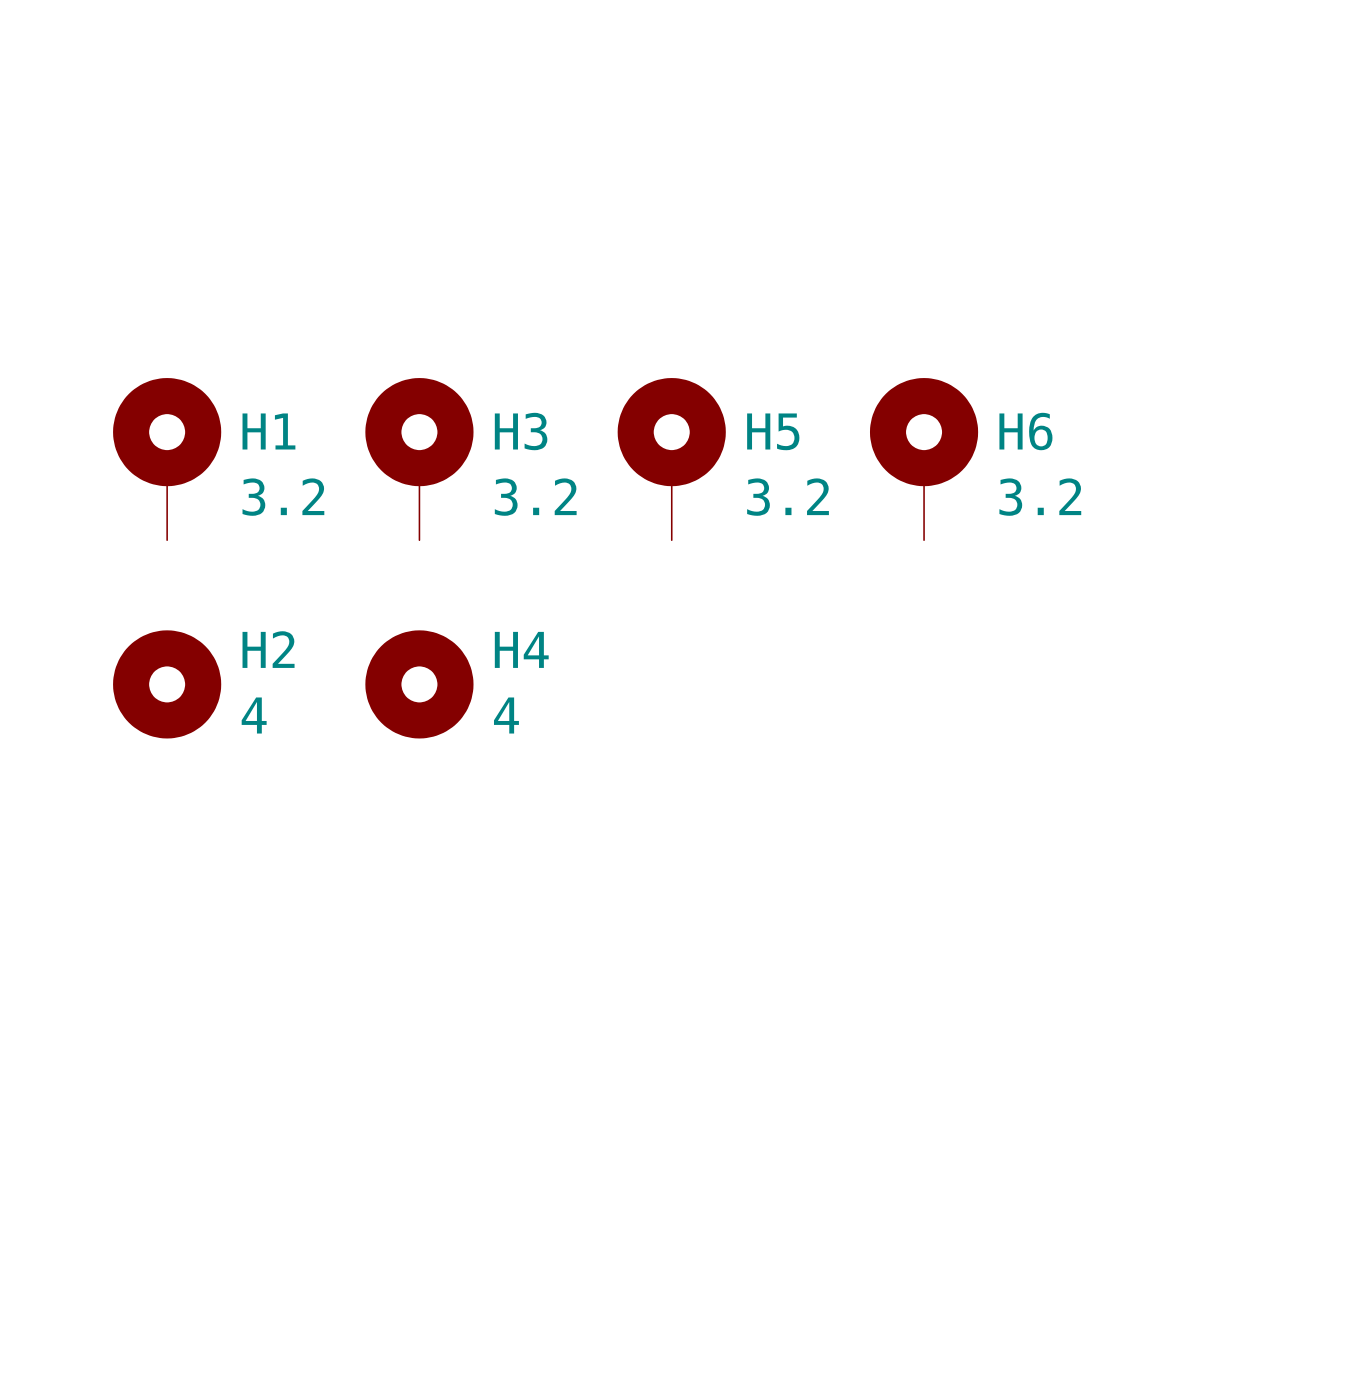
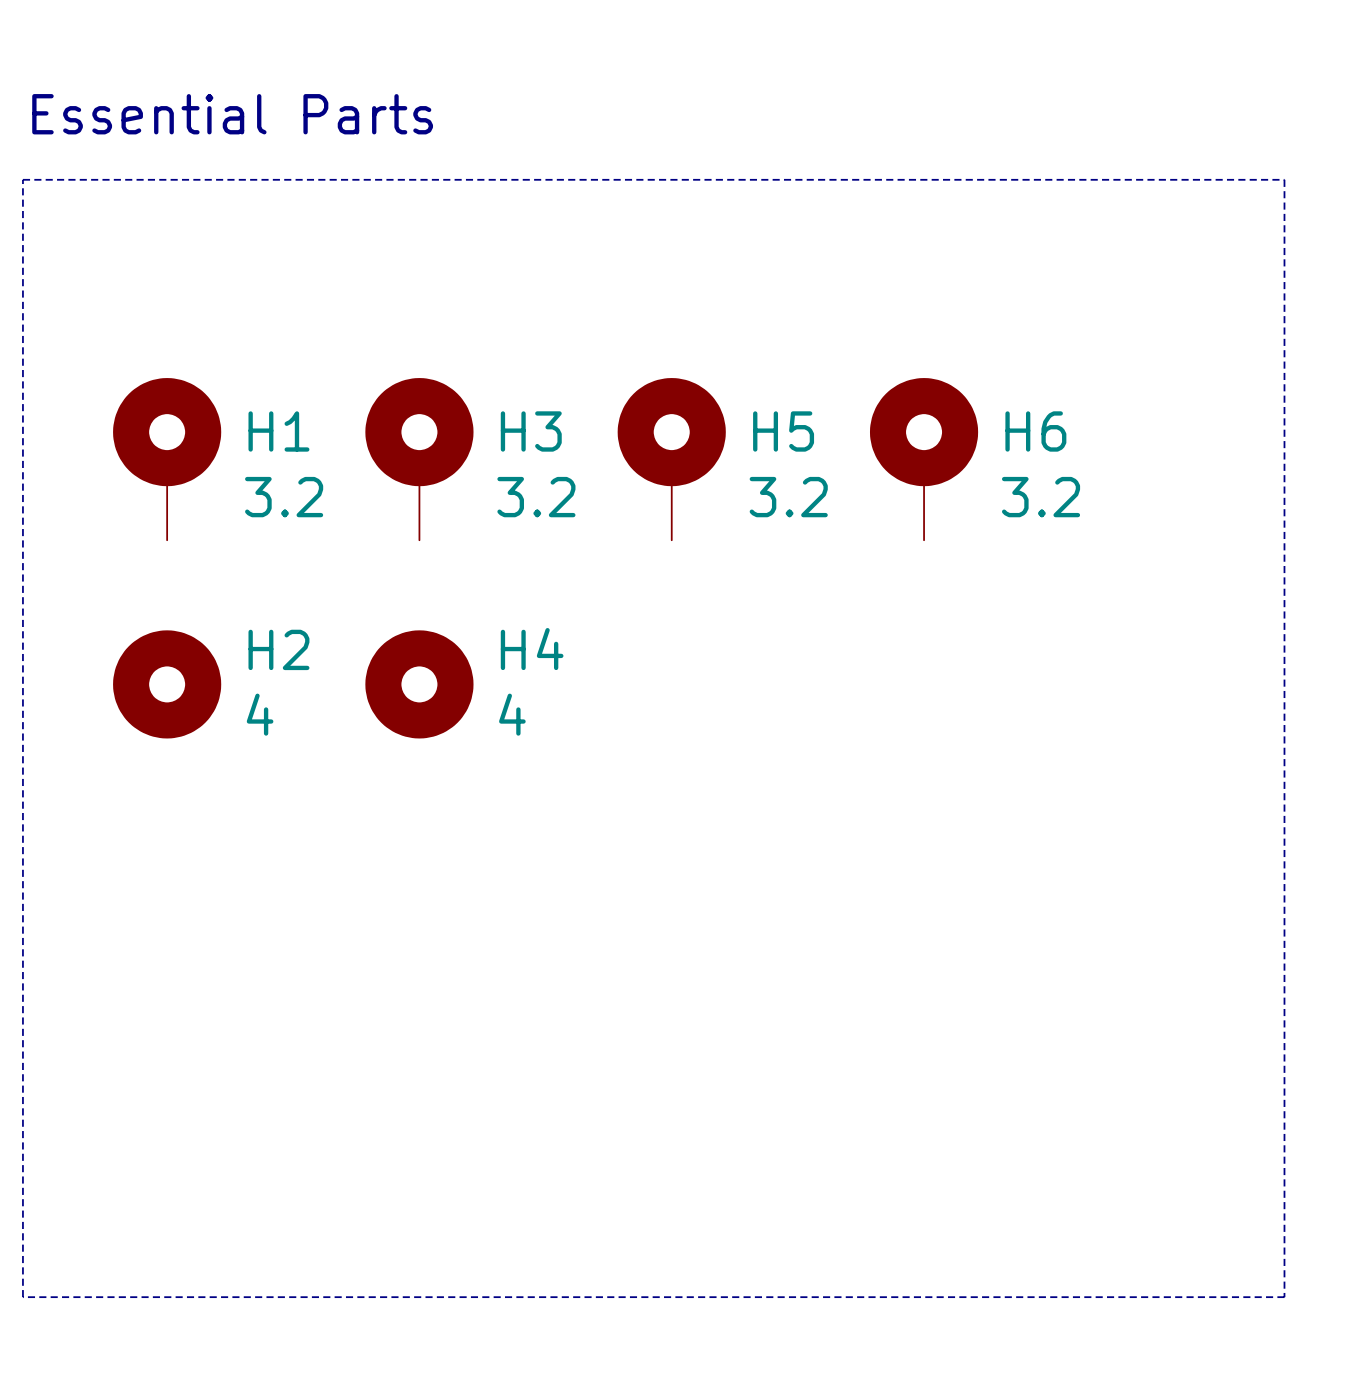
text: none -> Essential Parts (232, 114)
line: none -> (22, 179) (22, 1297) (1284, 1297) (1284, 179) (22, 179)

